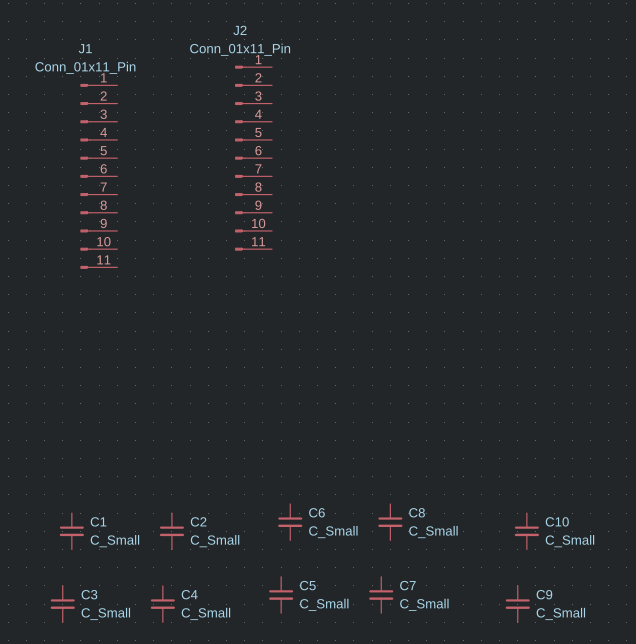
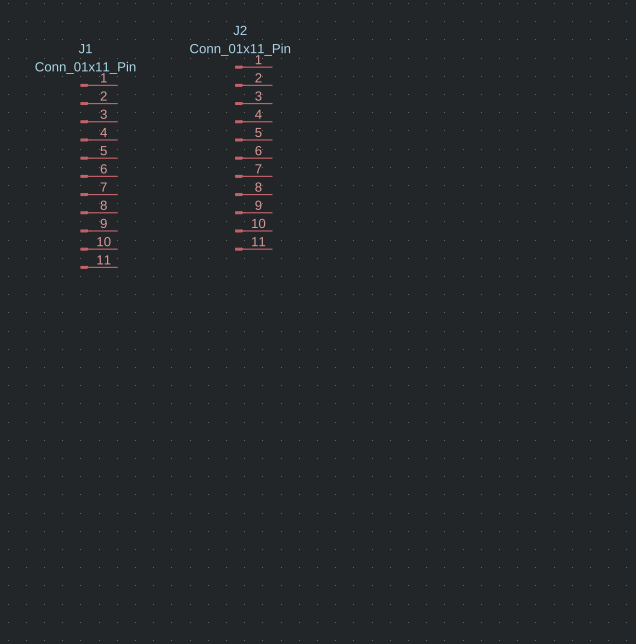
C6: C_Small (290, 522) -> none
C8: C_Small (390, 522) -> none
C1: C_Small (71, 531) -> none
C2: C_Small (171, 531) -> none
C10: C_Small (526, 531) -> none
C5: C_Small (281, 594) -> none
C7: C_Small (381, 594) -> none
C3: C_Small (62, 604) -> none
C4: C_Small (162, 604) -> none
C9: C_Small (517, 604) -> none

